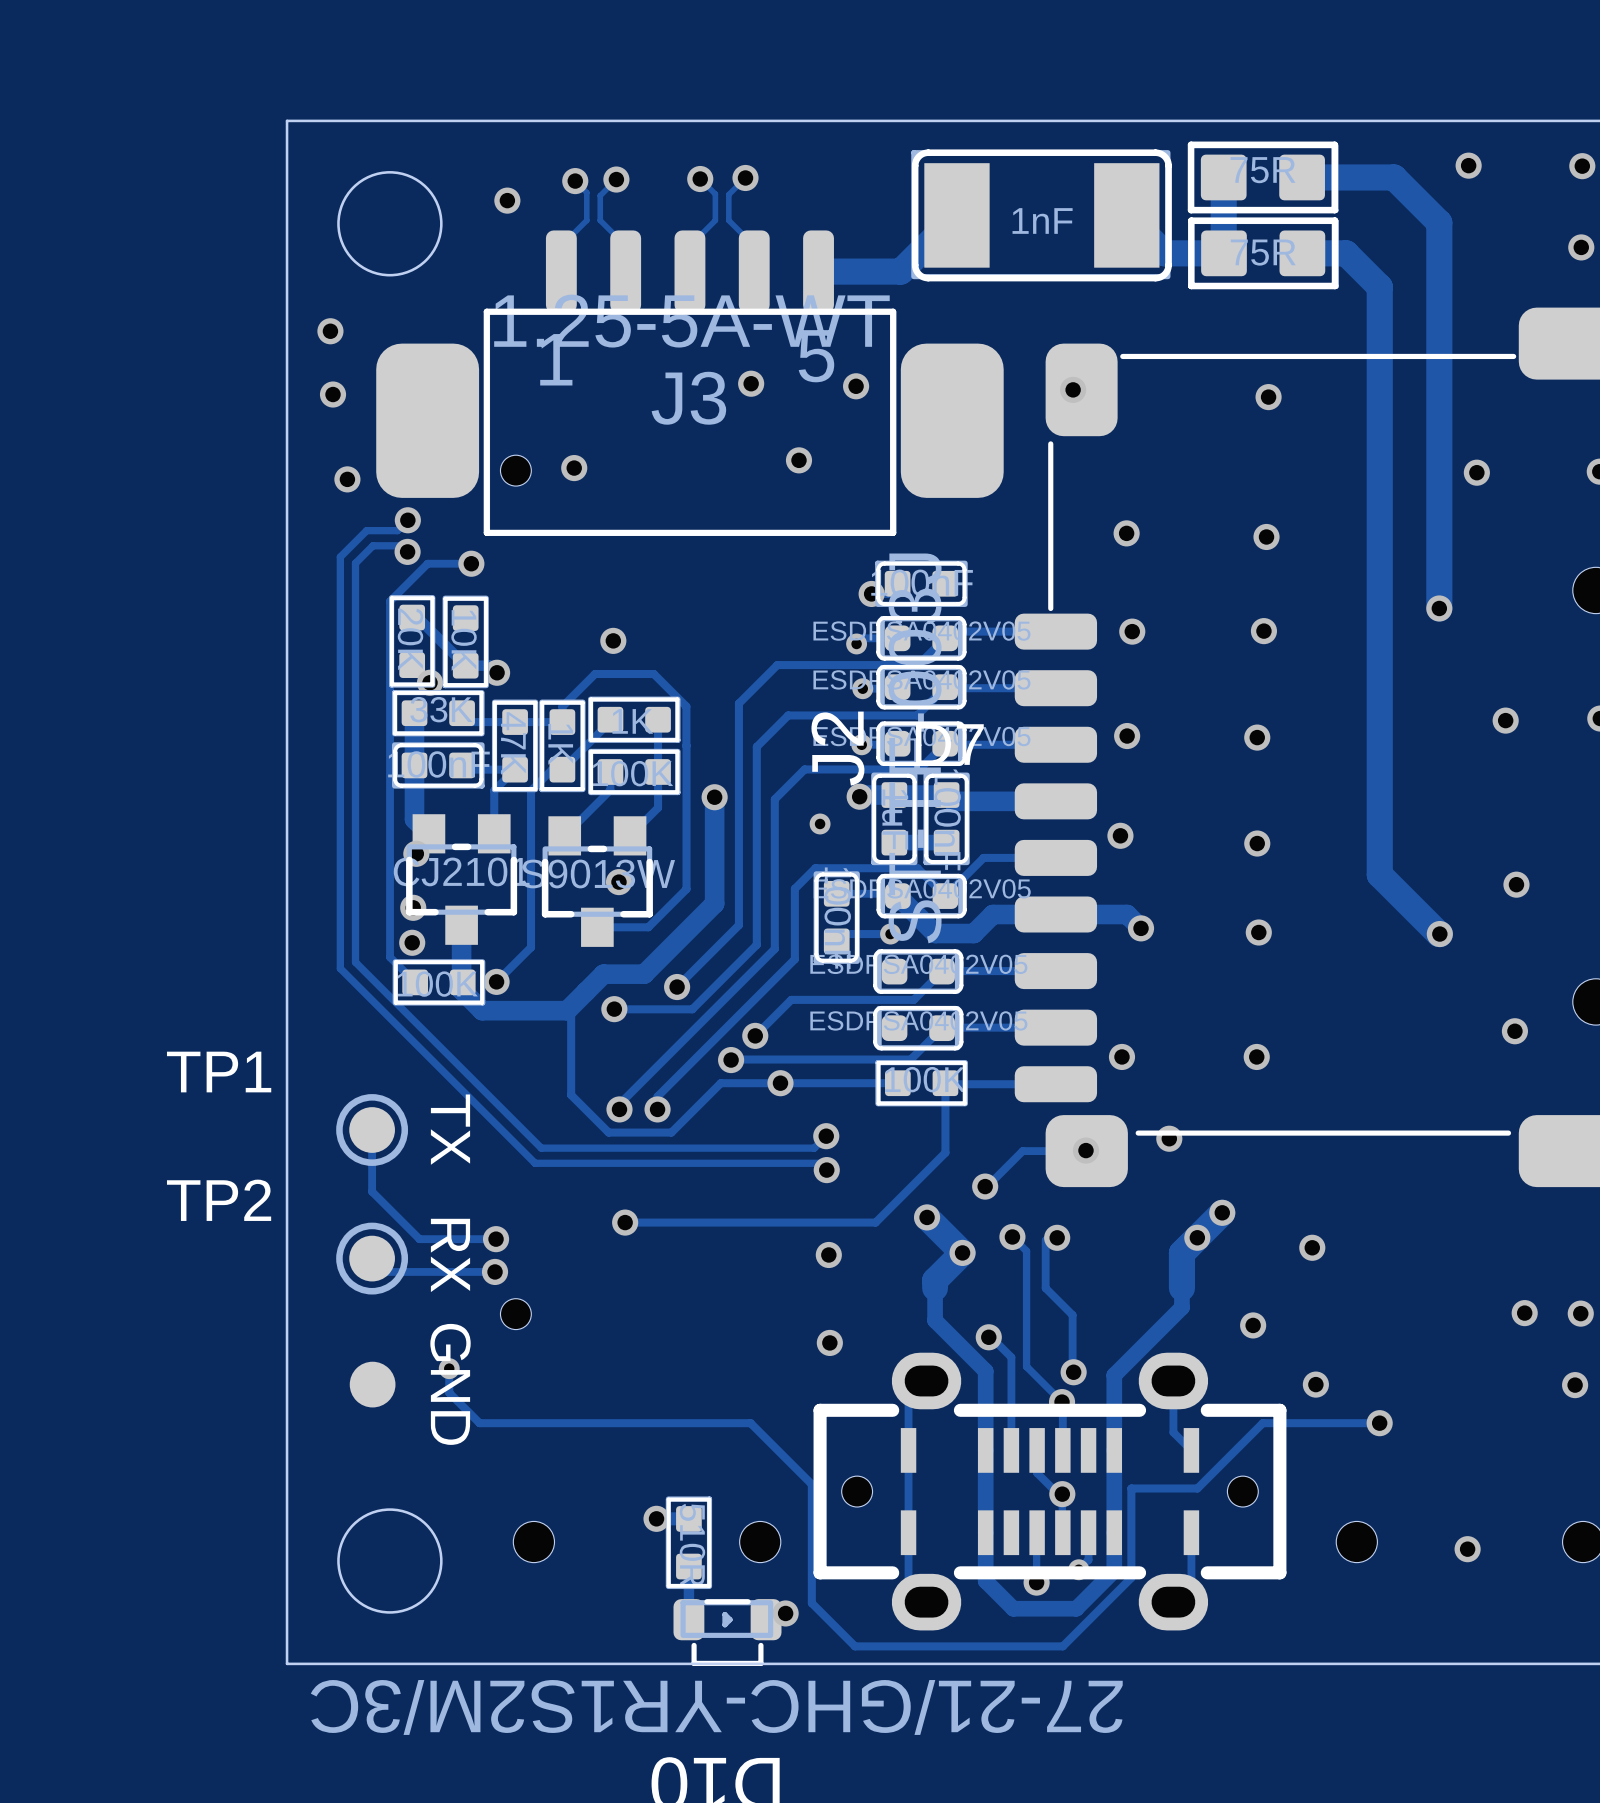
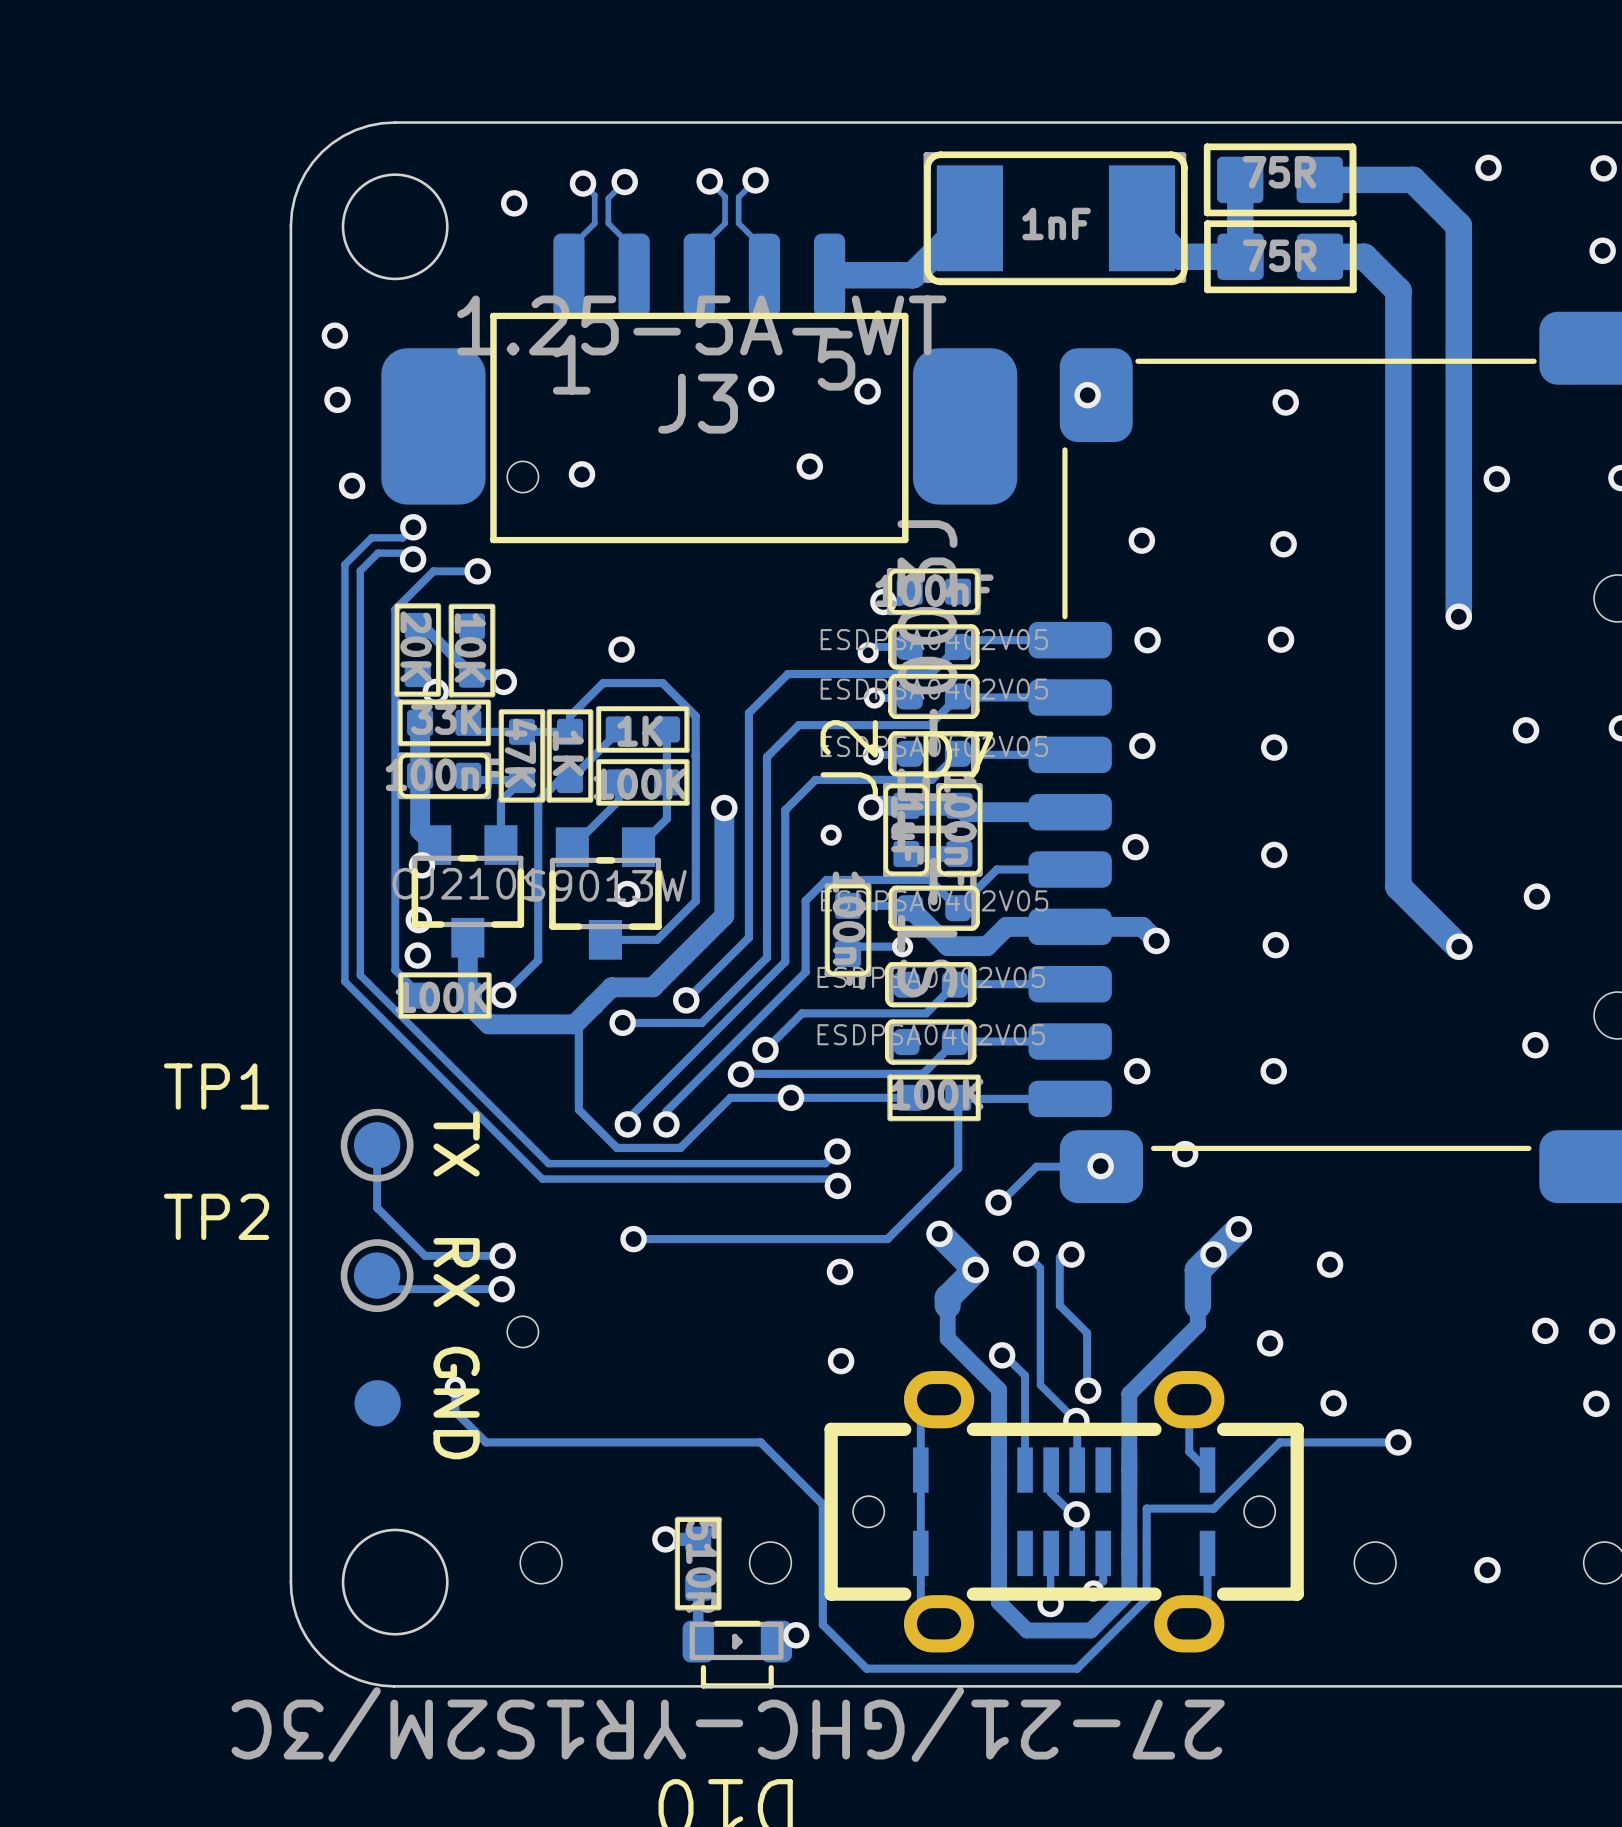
board edge: (390, 120) (287, 120) (287, 222) -> (395, 122) (368, 125) (355, 130) (332, 143) (321, 152) (312, 162) (299, 185) (291, 211) (290, 225)
board edge: (287, 1560) (287, 1663) (388, 1663) -> (290, 1581) (296, 1616) (306, 1637) (320, 1655) (338, 1670) (359, 1680) (393, 1686)

